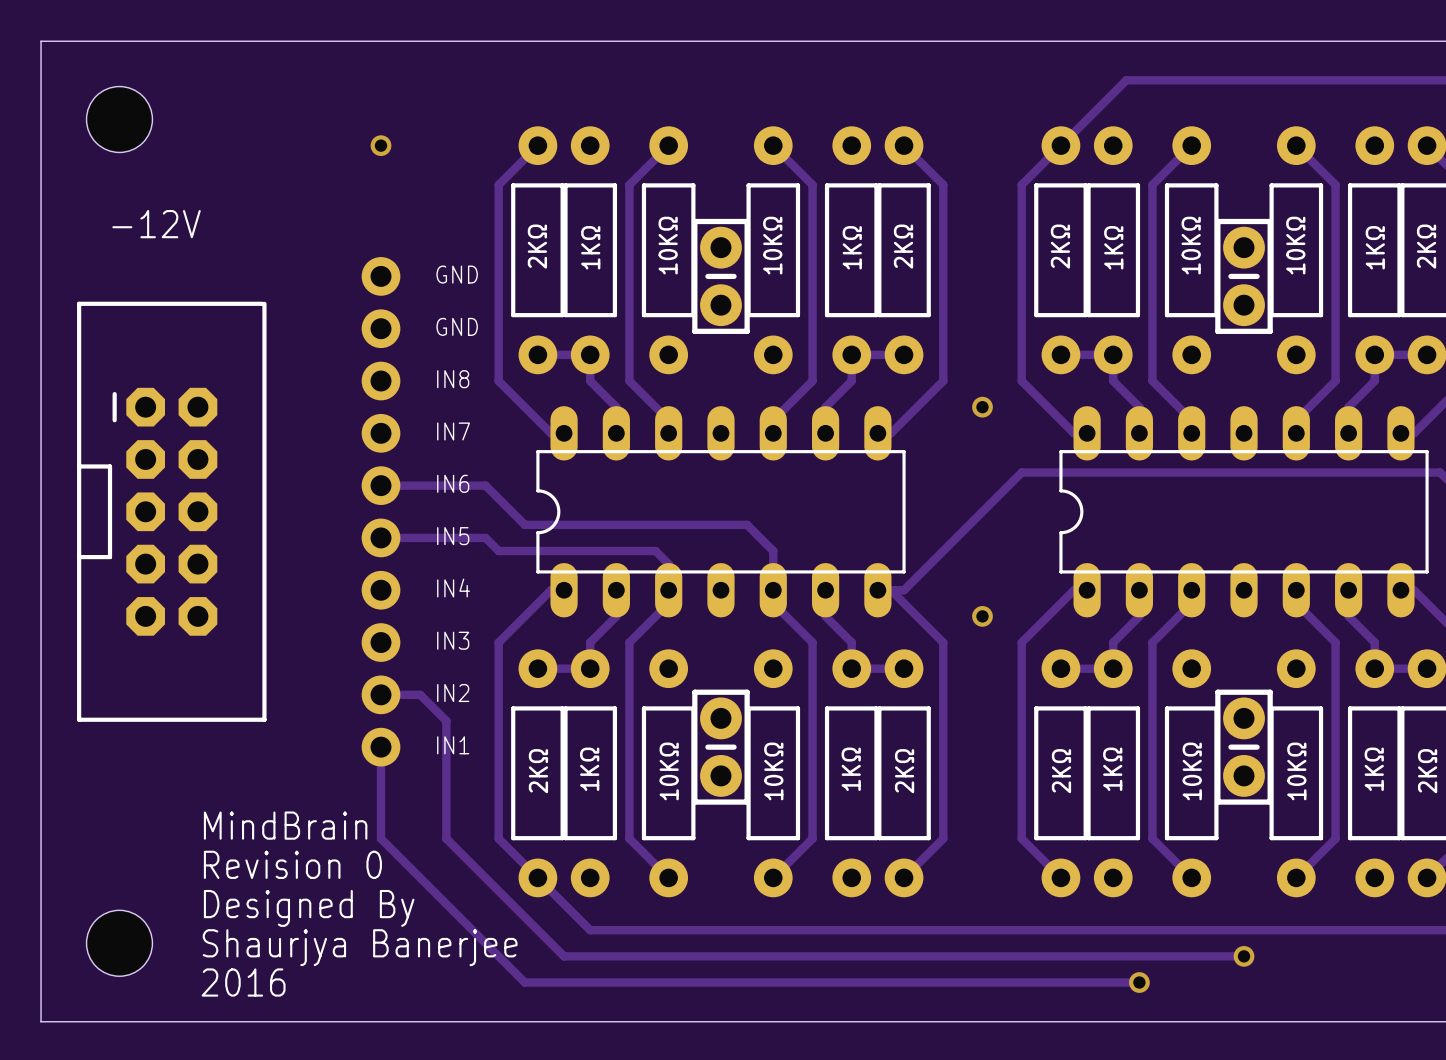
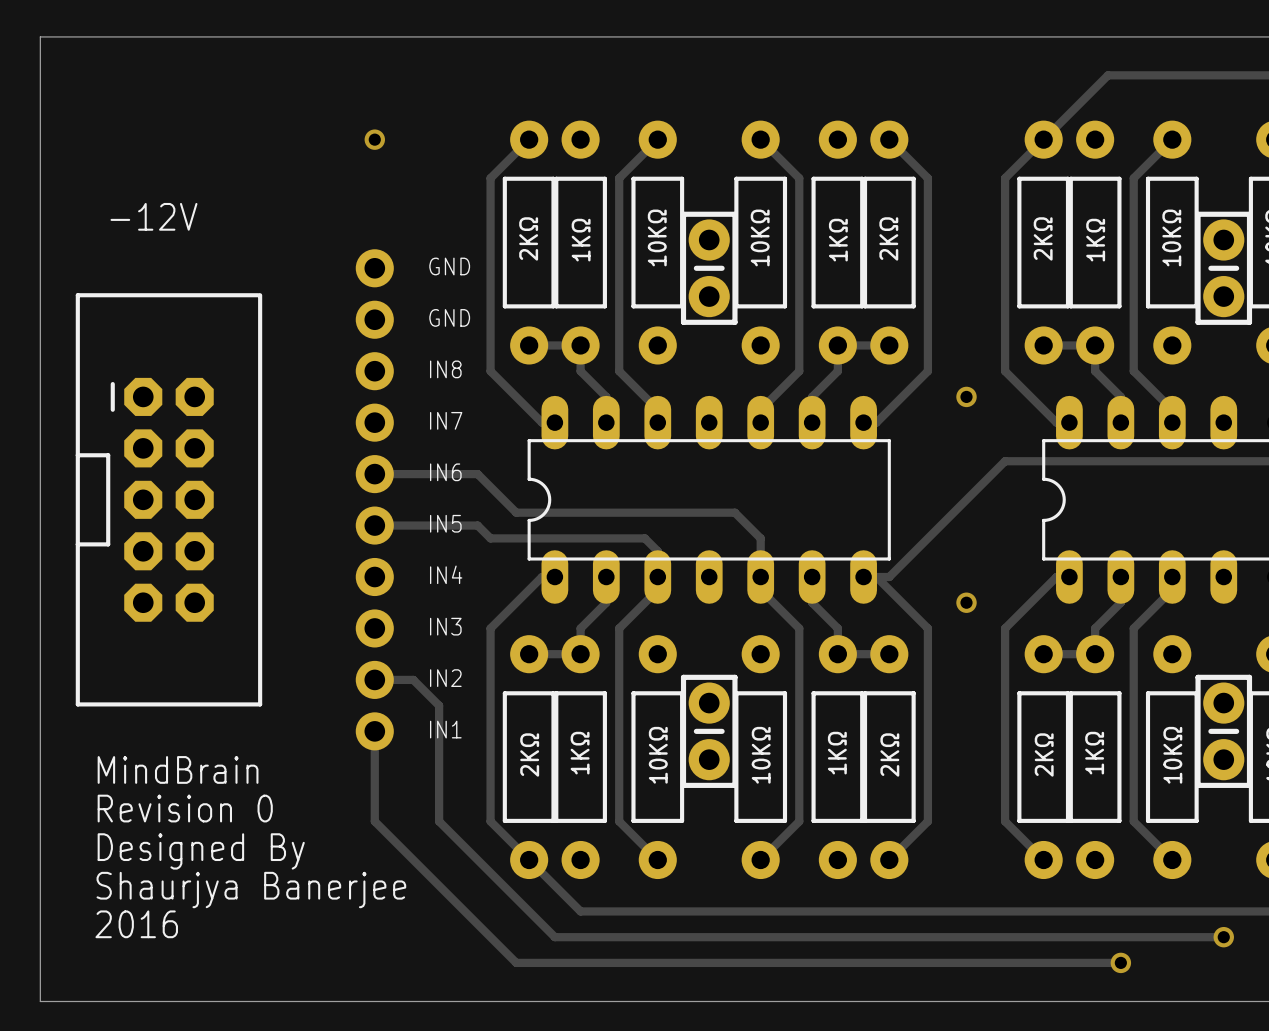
hole: (119, 119) -> none
text position: MindBrain (285, 825) -> MindBrain (178, 769)
text position: Revision 0 (292, 864) -> Revision 0 (185, 808)
text position: Designed By (309, 908) -> Designed By (201, 851)
hole: (119, 943) -> none
text position: Shaurjya Banerjee (360, 947) -> Shaurjya Banerjee (251, 890)
text position: 2016 (243, 982) -> 2016 (136, 924)

